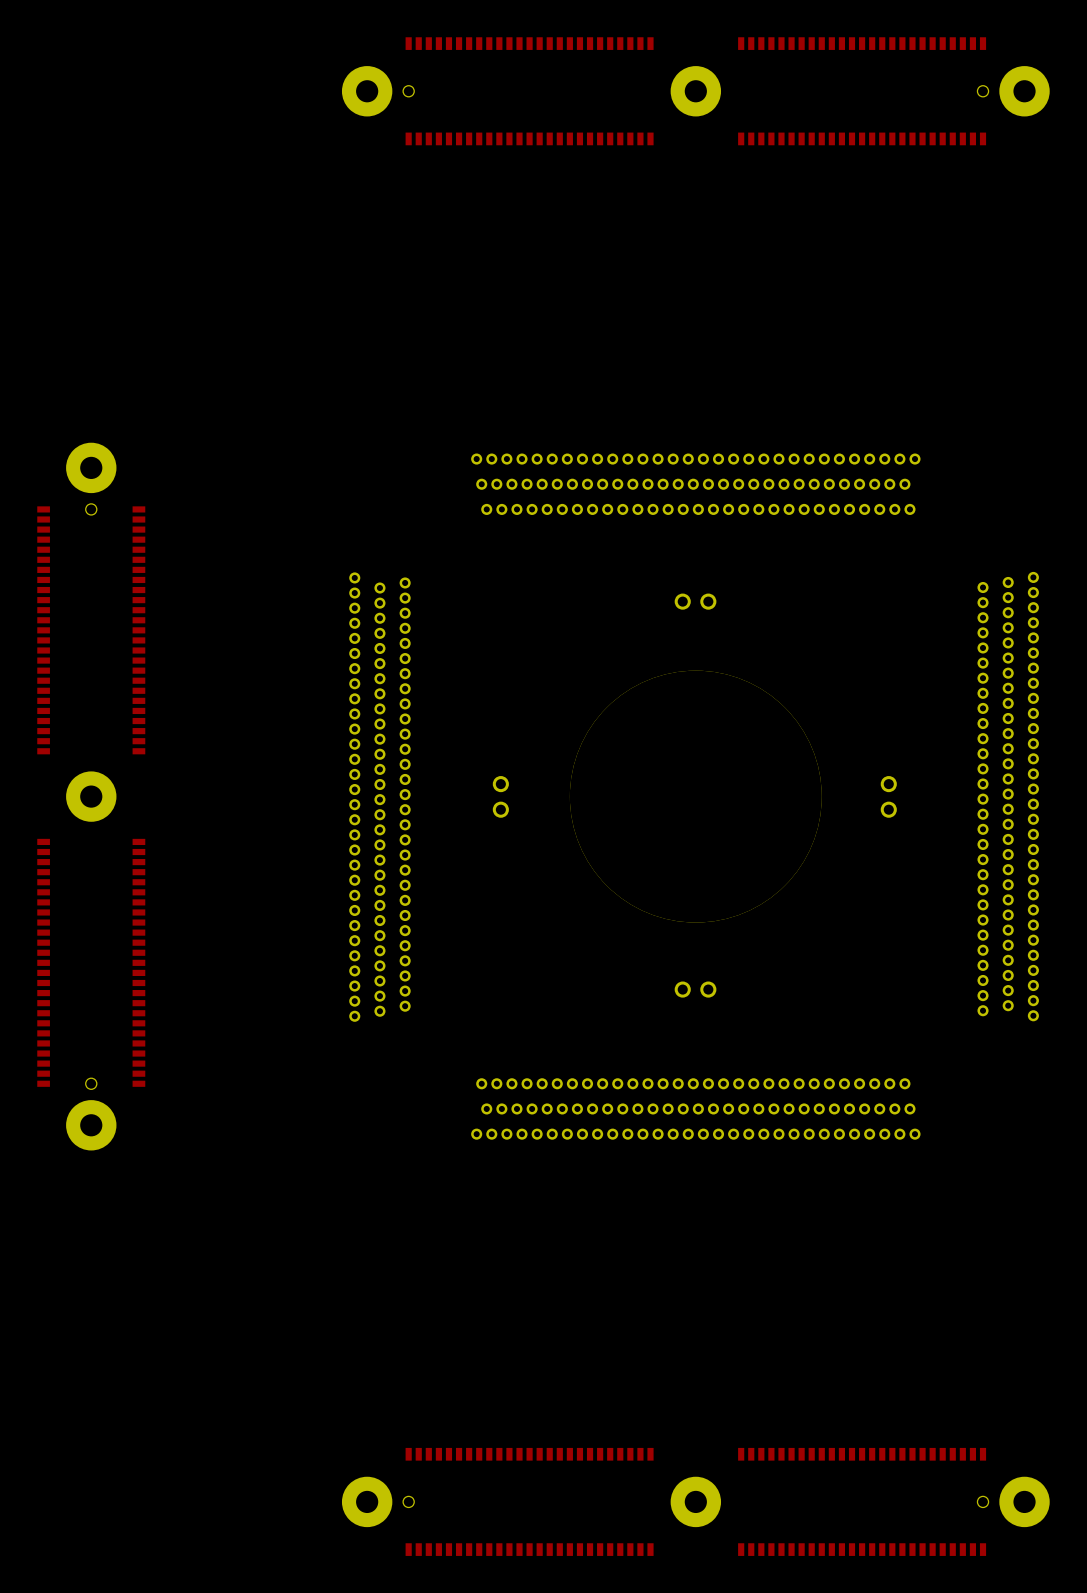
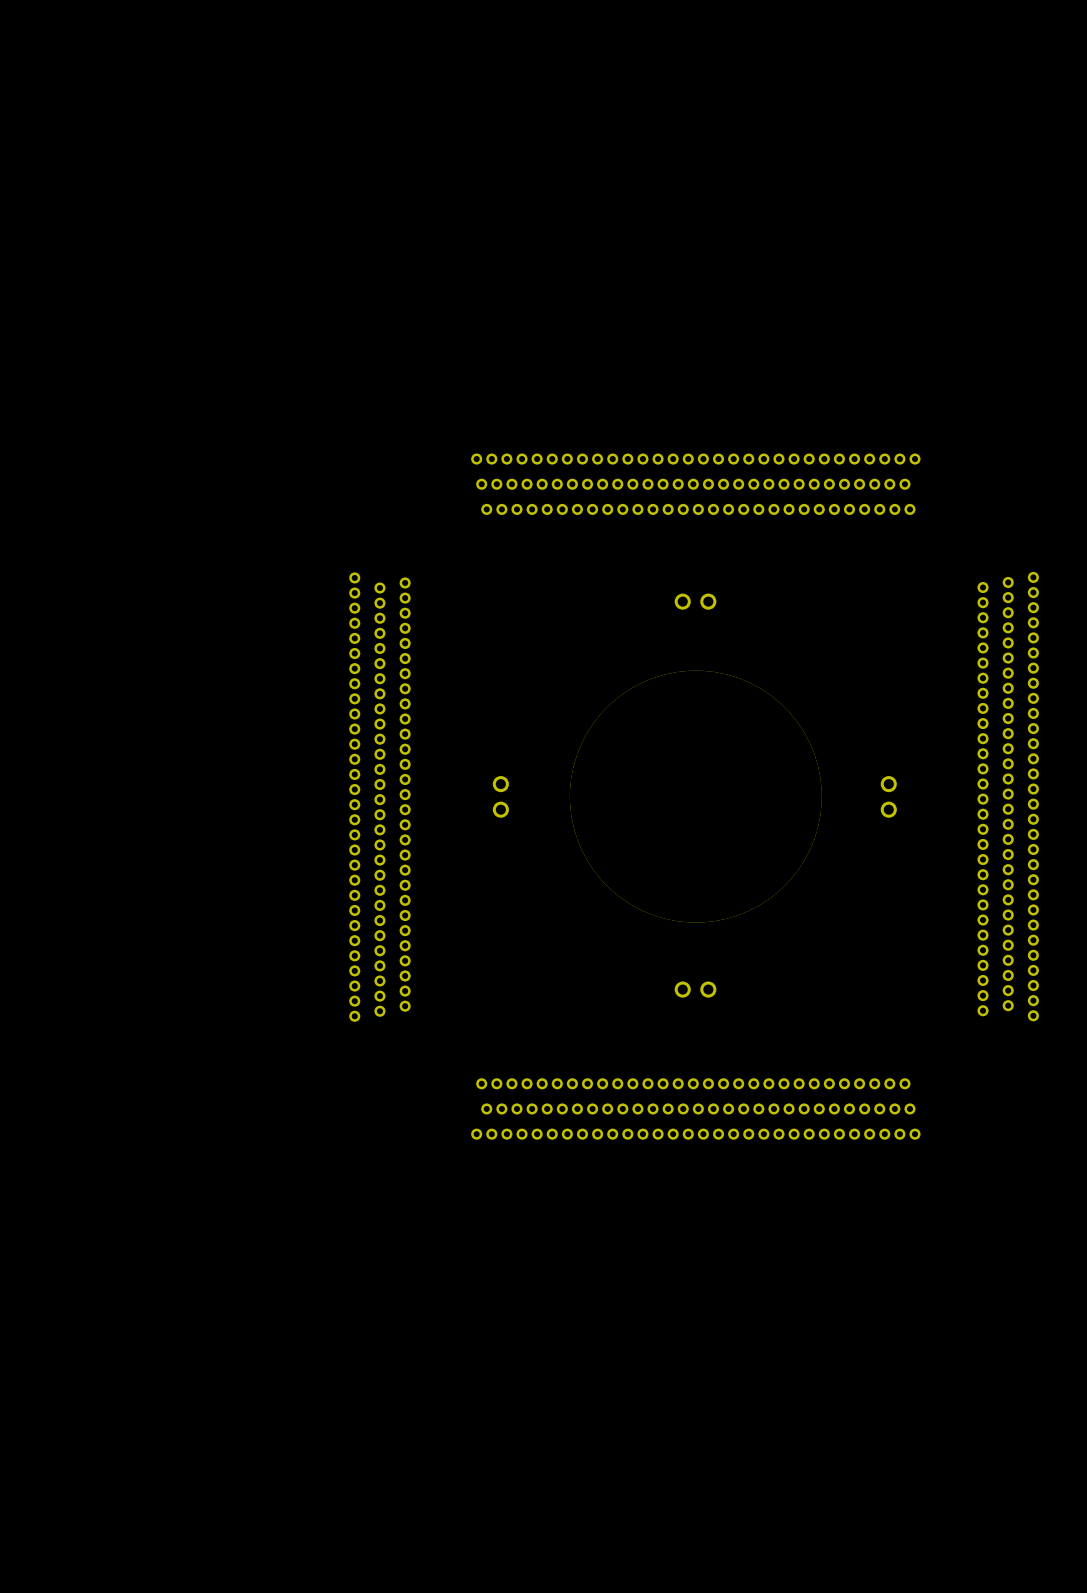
part: (695, 91) -> none
part: (91, 796) -> none
part: (695, 1501) -> none

